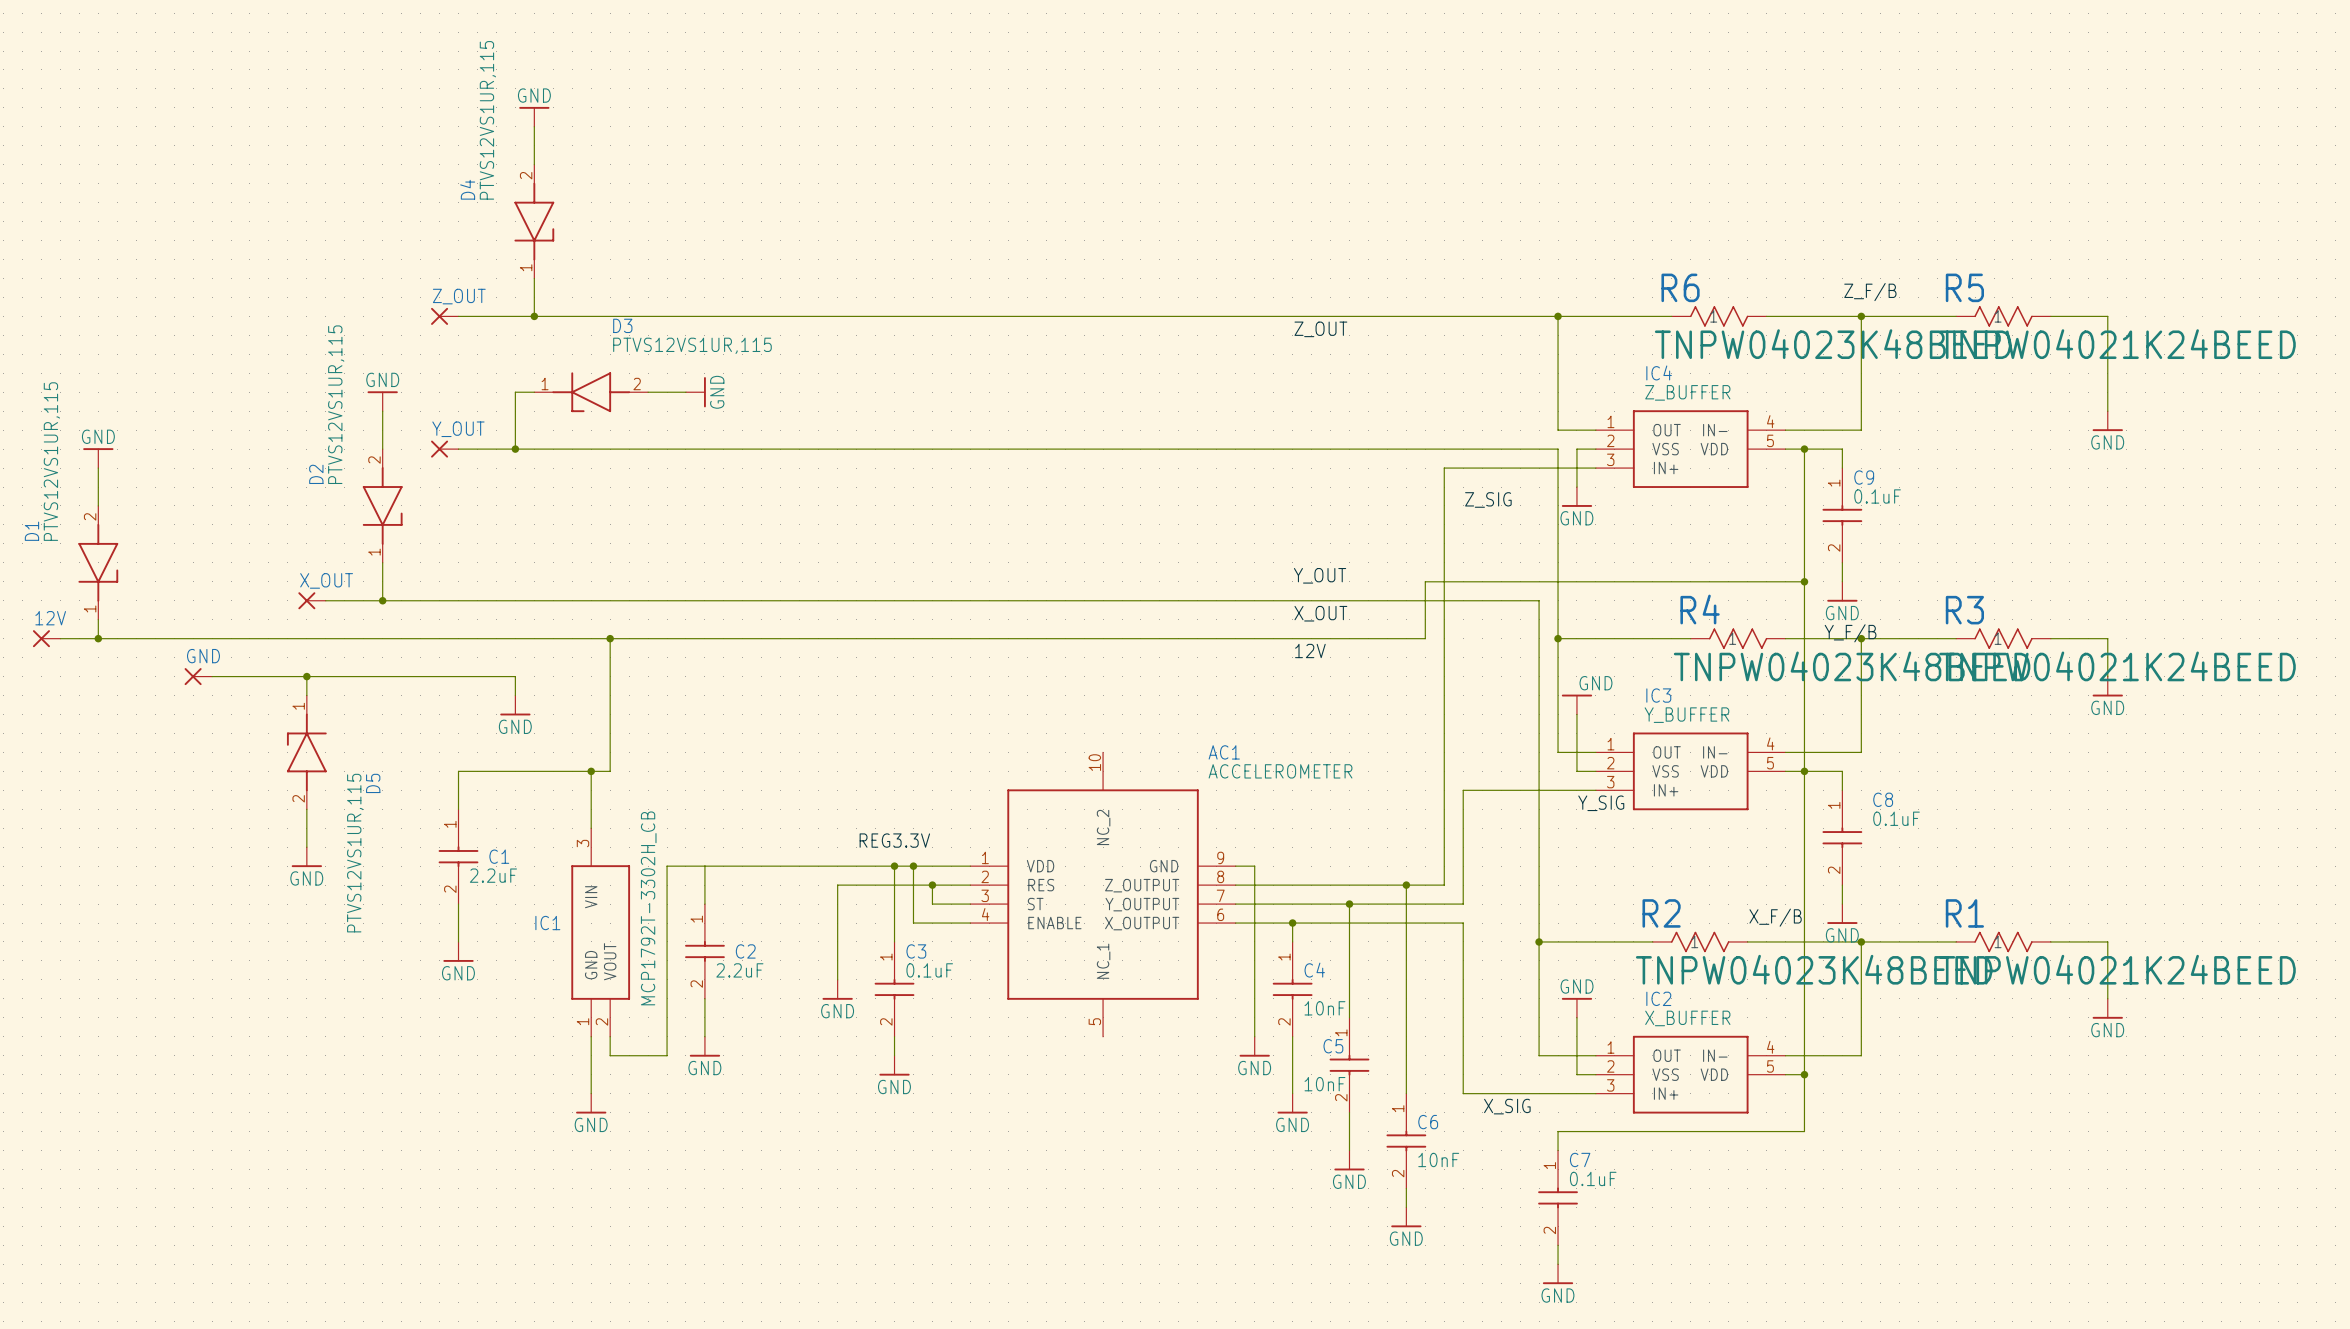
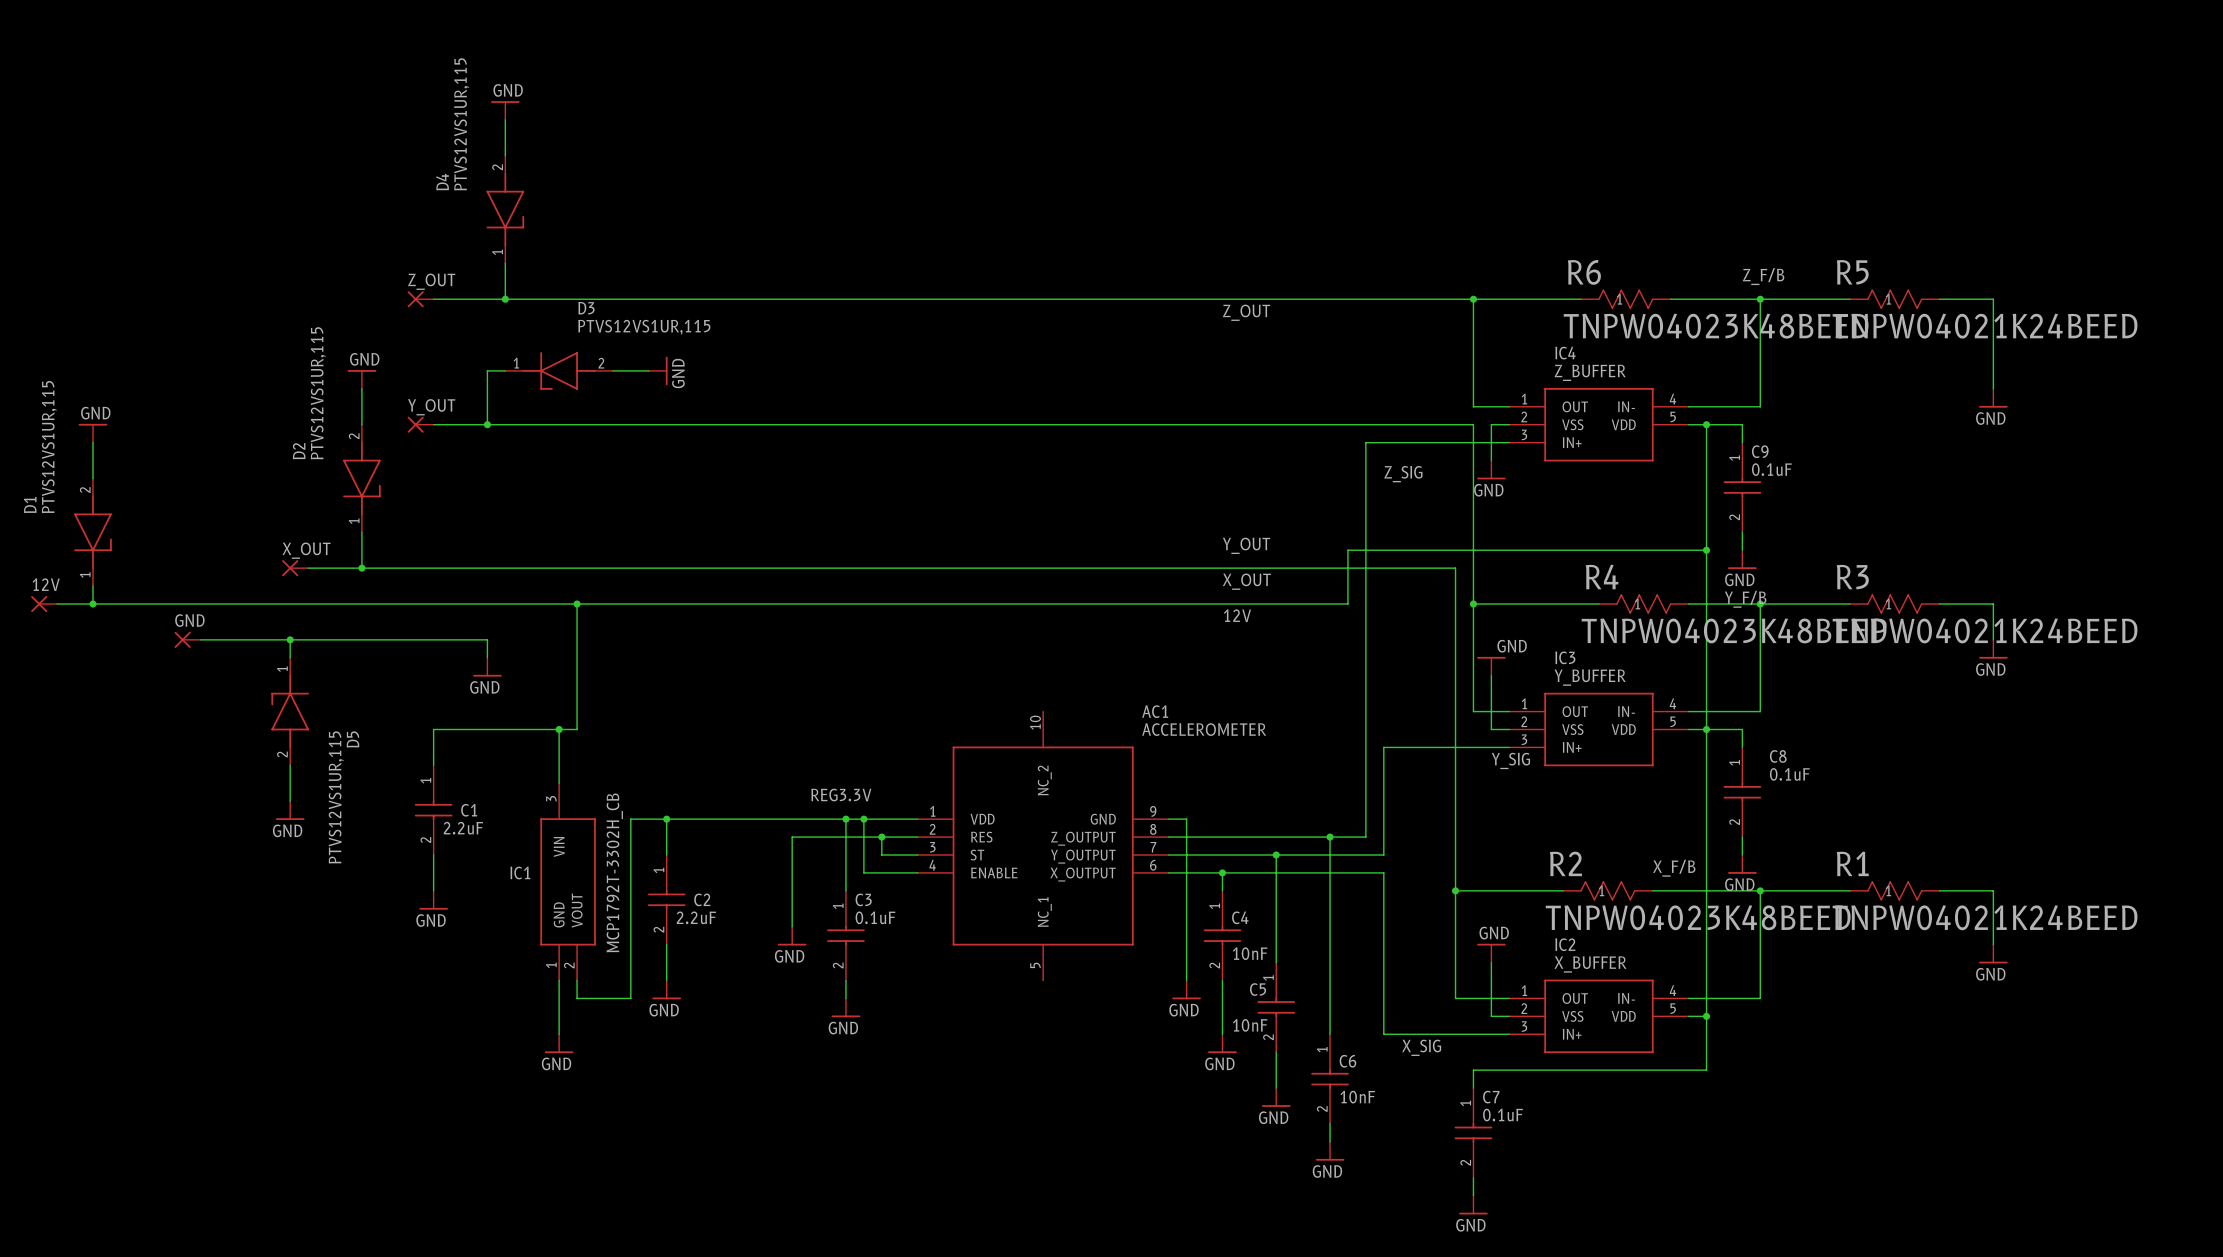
junction: none -> (666, 819)

